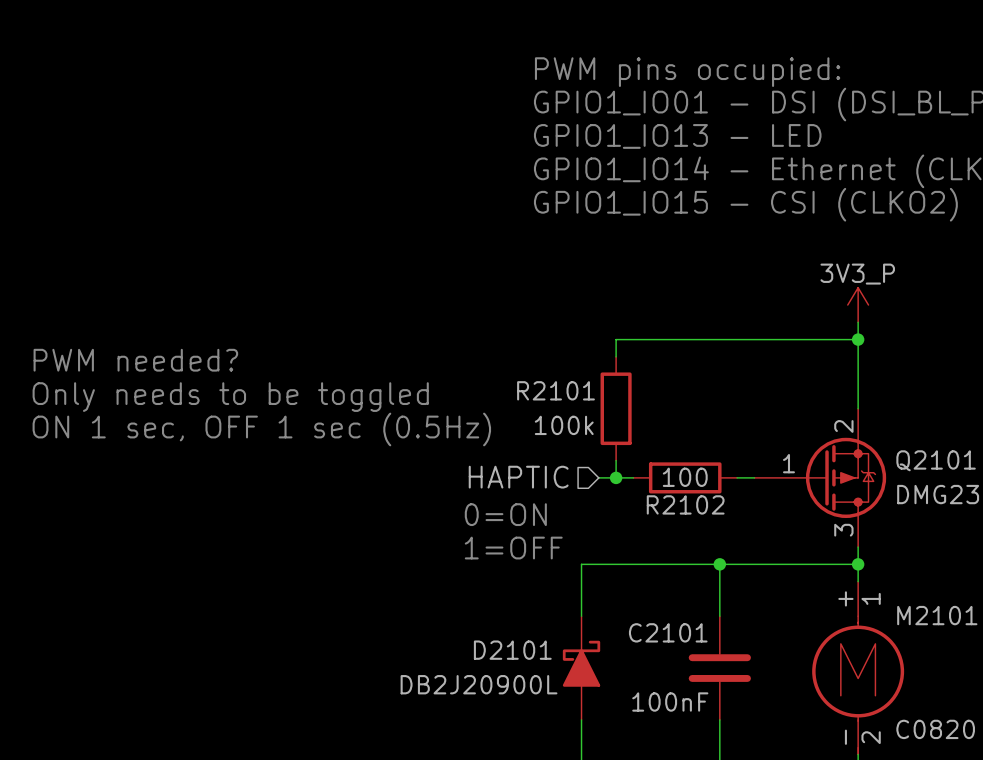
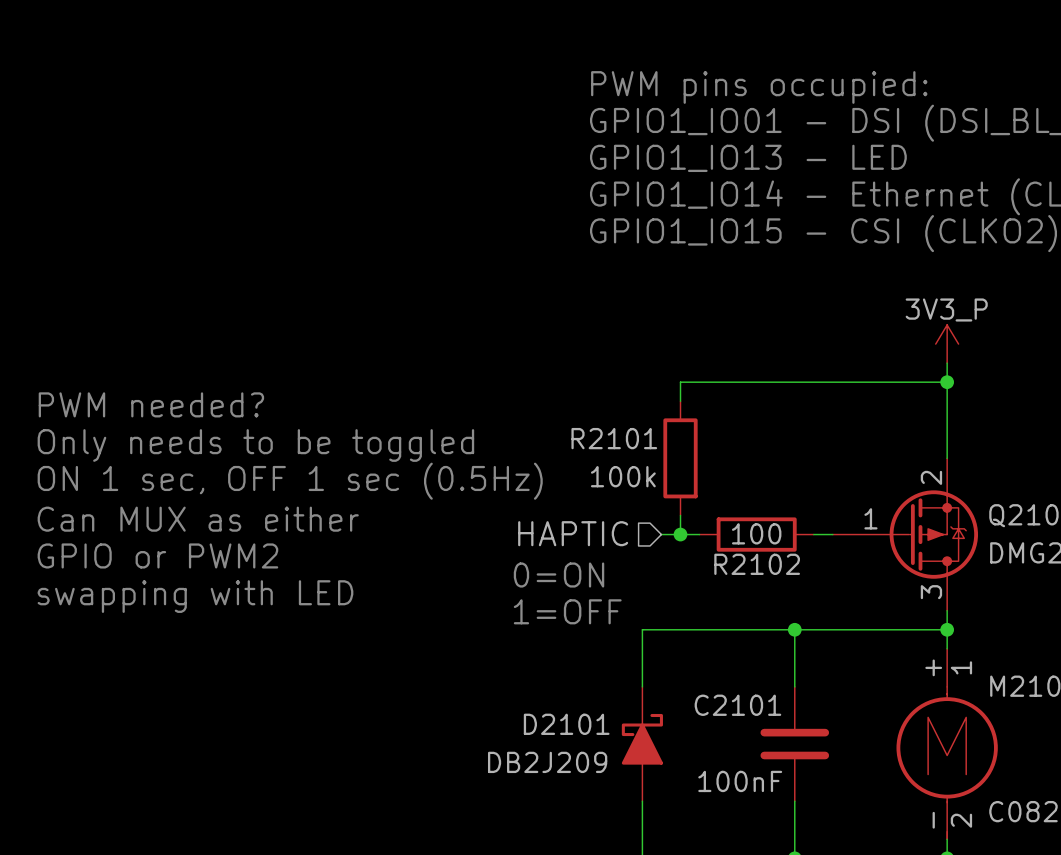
text: none -> Can MUX as either (198, 519)
text: none -> GPIO or PWM2 (157, 555)
text: none -> swapping with LED (195, 596)
D2101 value: DB2J20900L (479, 684) -> DB2J209 (547, 762)

